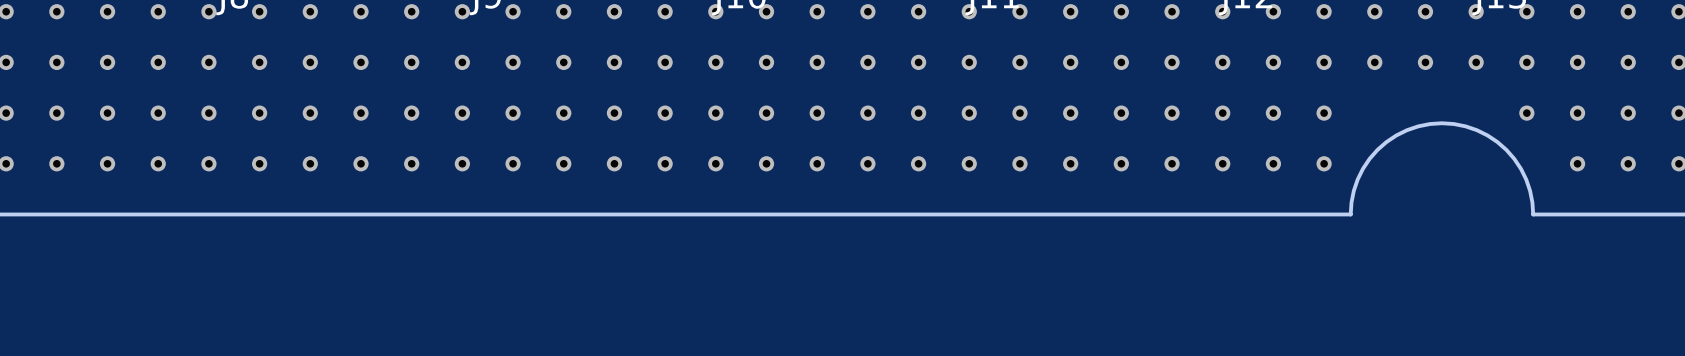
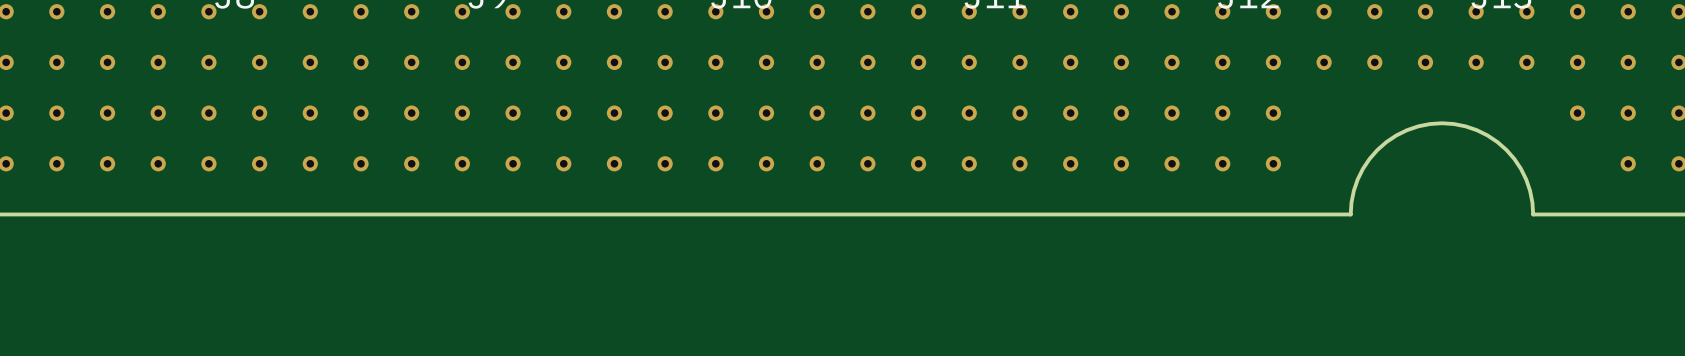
via: (1324, 113) -> none
via: (1526, 113) -> none
via: (1324, 163) -> none
via: (1577, 163) -> none

